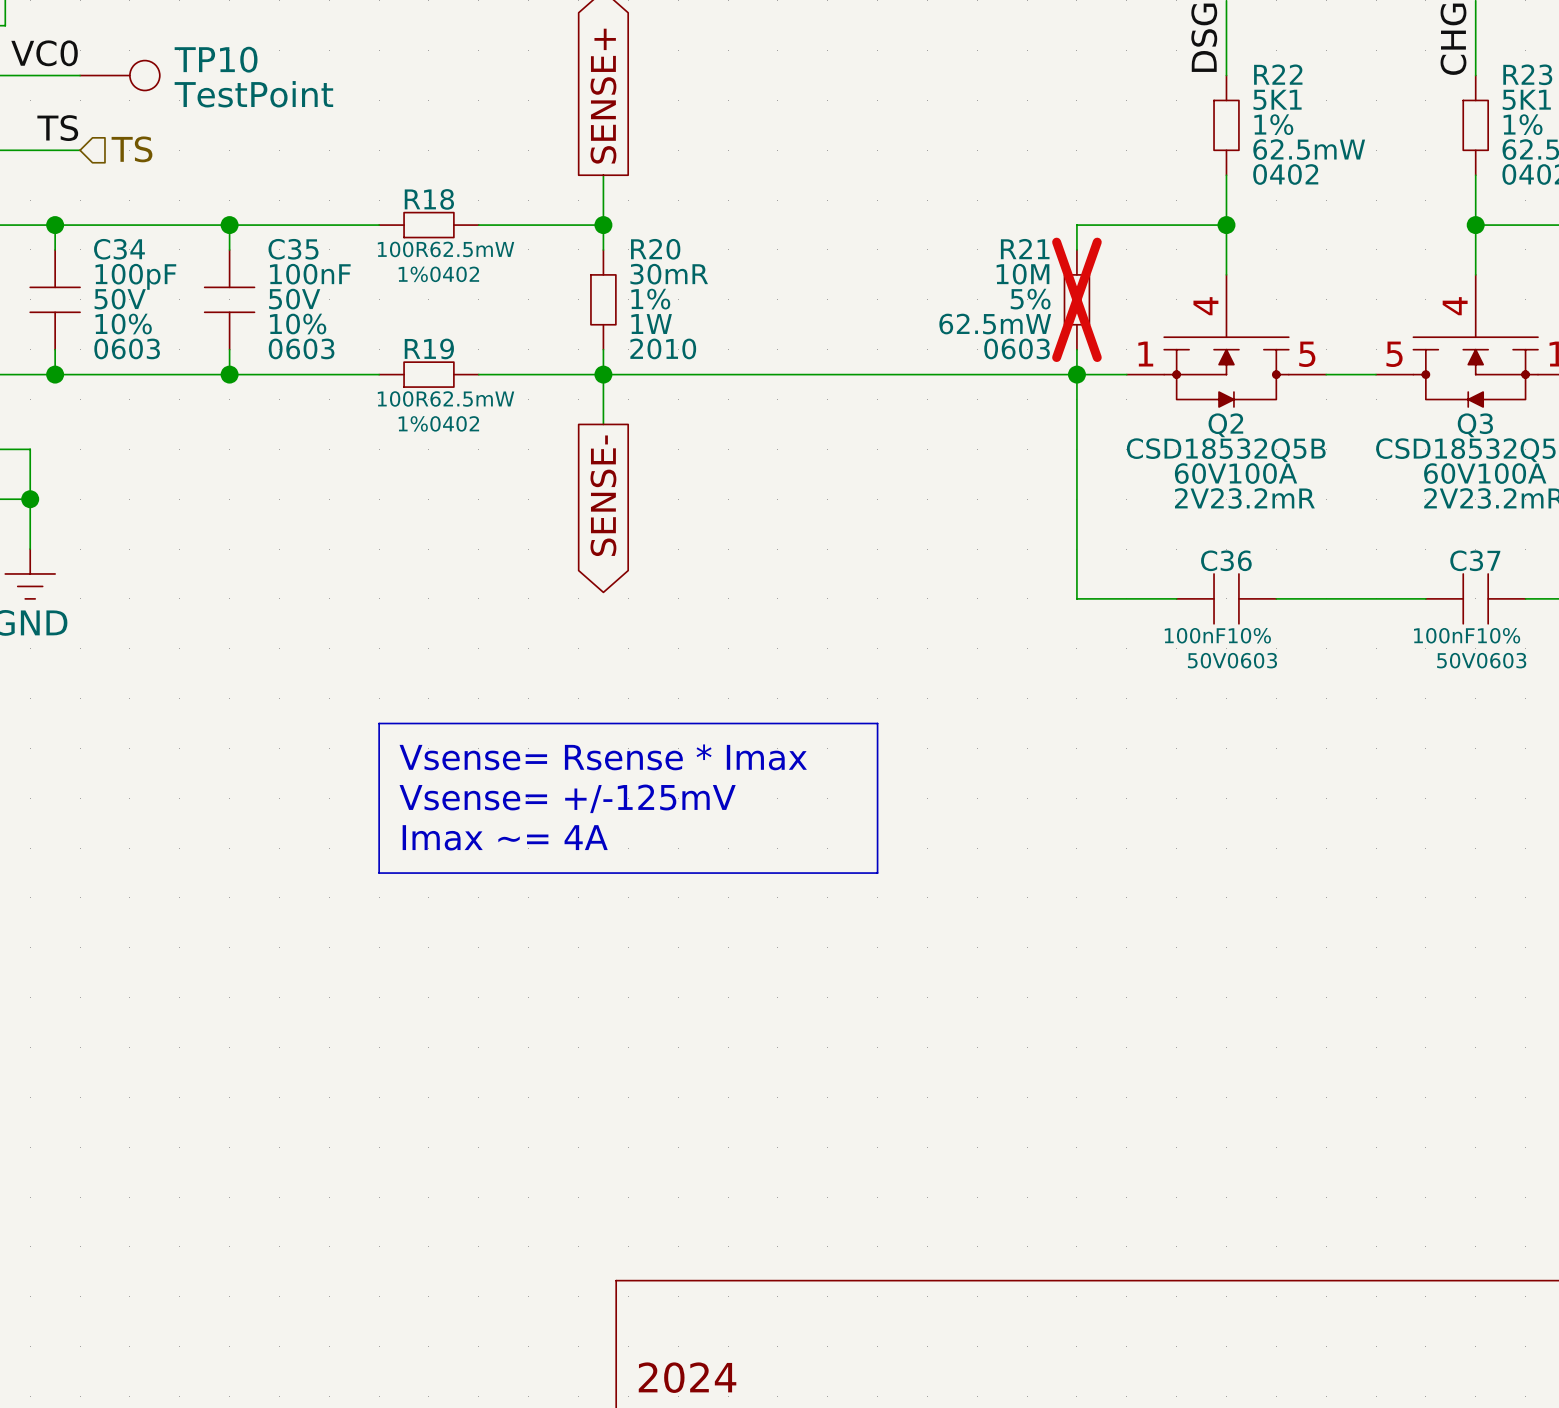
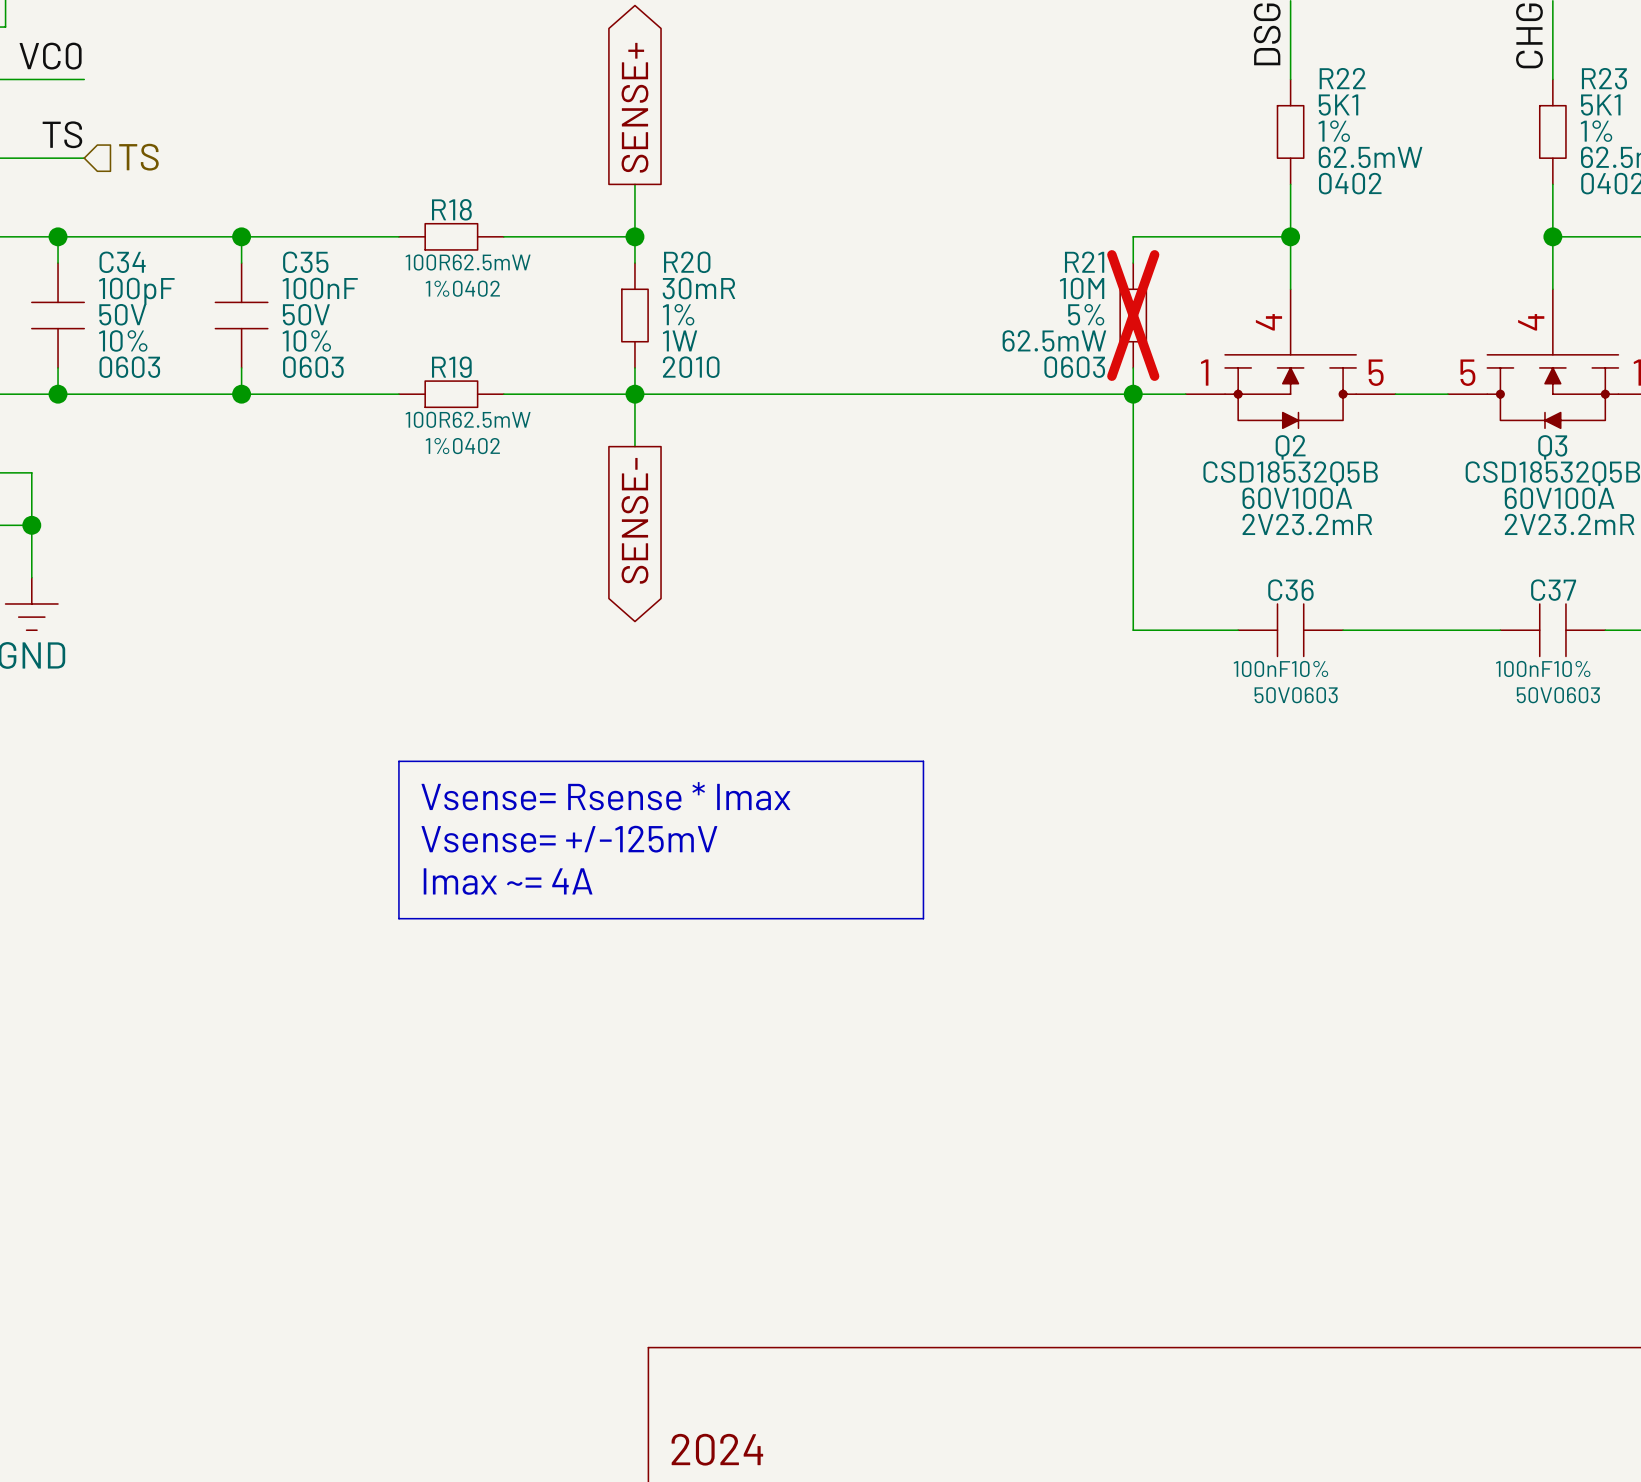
TP10: TestPoint (119, 75) -> none

